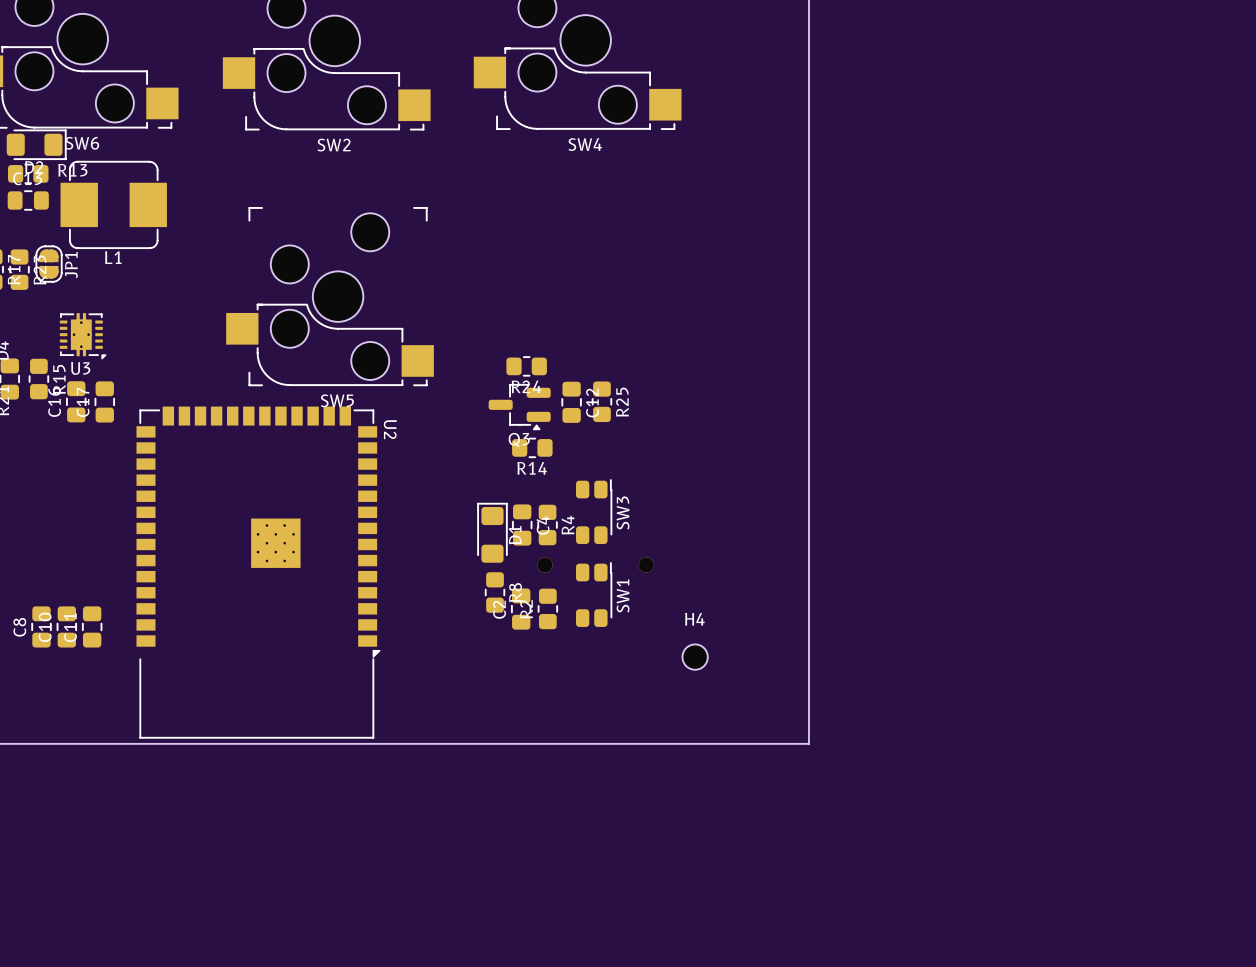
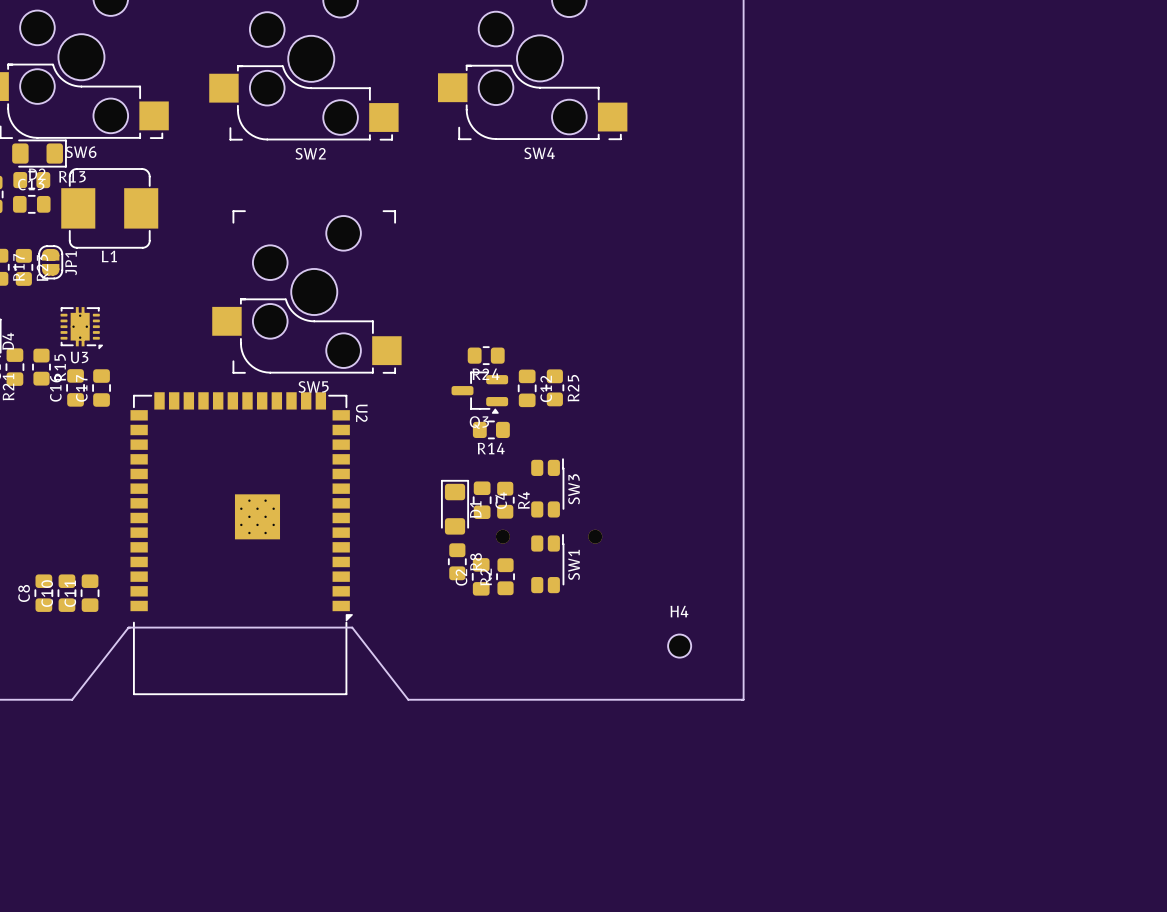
H4 position: (695, 657) -> (679, 646)
board edge: (72, 743) (441, 743) -> (72, 699) (128, 627) (352, 627) (408, 699)

